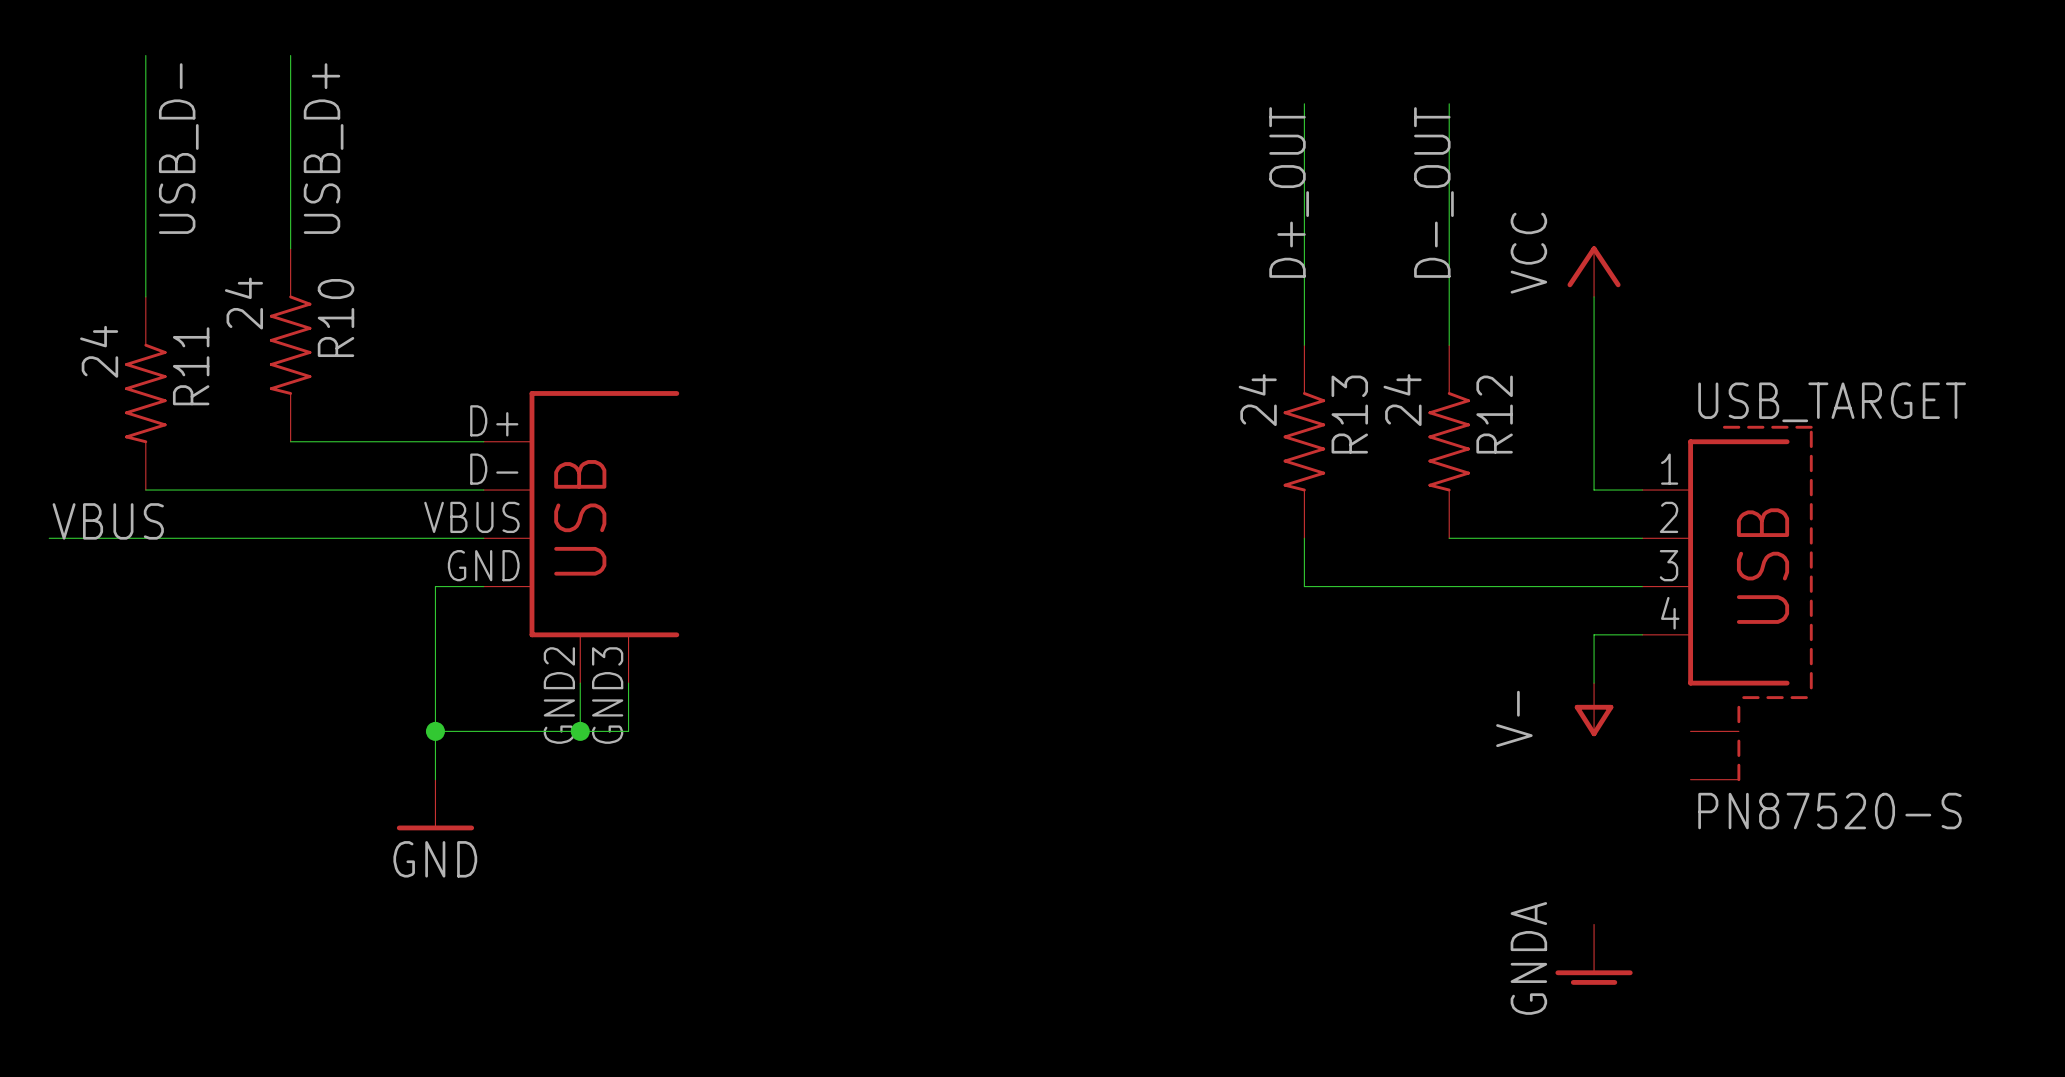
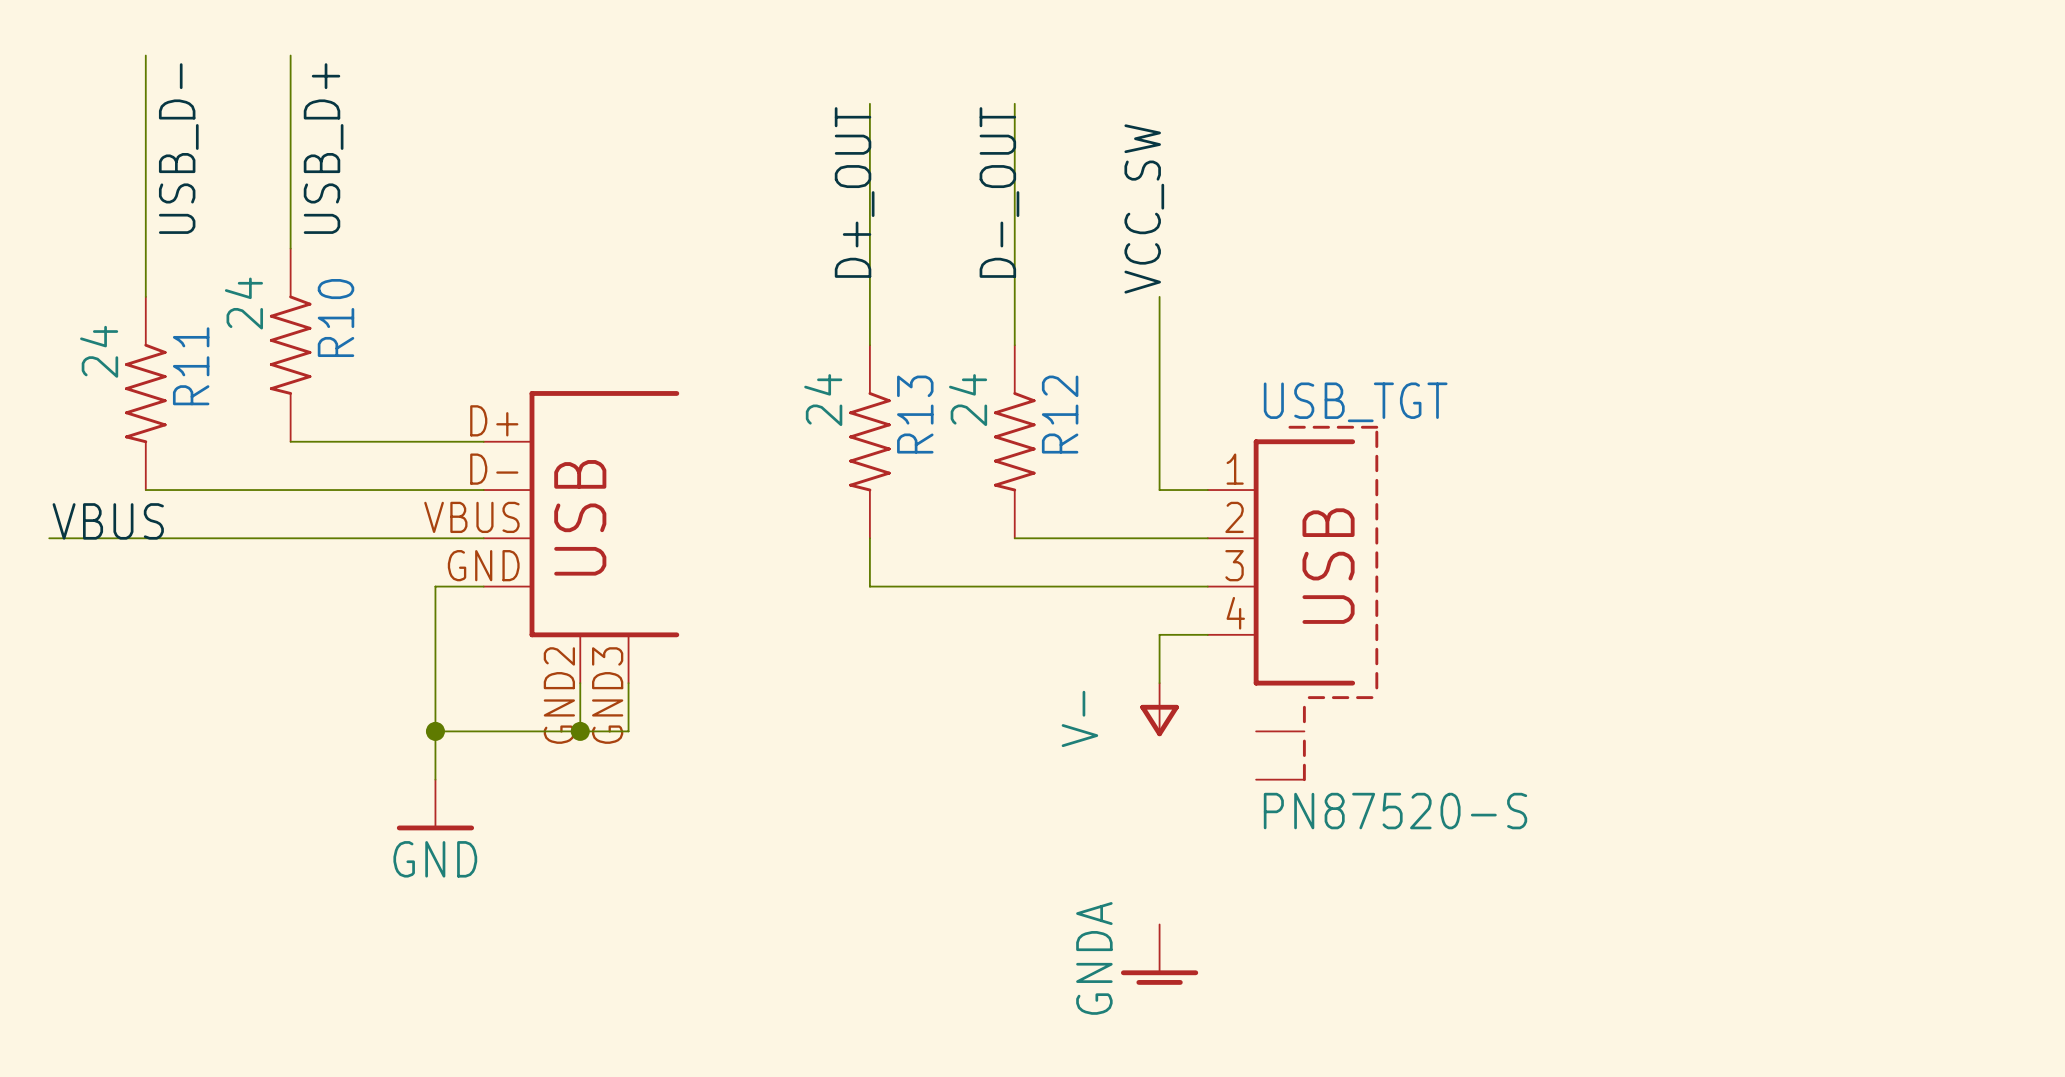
wire: (1304, 103) (1304, 345) -> (869, 103) (869, 345)
wire: (1449, 103) (1449, 345) -> (1014, 103) (1014, 345)
label position: D+_OUT (1289, 192) -> D+_OUT (854, 192)
label position: D-_OUT (1433, 192) -> D-_OUT (999, 192)
label: none -> VCC_SW (1144, 208)
power symbol: VCC (1594, 271) -> none
wire: (1594, 296) (1594, 490) (1642, 490) -> (1159, 296) (1159, 490) (1207, 490)
R13 position: (1304, 441) -> (869, 441)
R12 position: (1449, 441) -> (1014, 441)
wire: (1304, 538) (1304, 586) (1642, 586) -> (869, 538) (869, 586) (1207, 586)
wire: (1449, 538) (1642, 538) -> (1014, 538) (1207, 538)
USB_TGT: none -> PN87520-S (1293, 603)
USB_TARGET: PN87520-S (1727, 603) -> none
wire: (1642, 634) (1594, 634) (1594, 683) -> (1207, 634) (1159, 634) (1159, 683)
power symbol position: V- (1594, 709) -> V- (1159, 709)
power symbol position: GNDA (1594, 954) -> GNDA (1159, 954)

